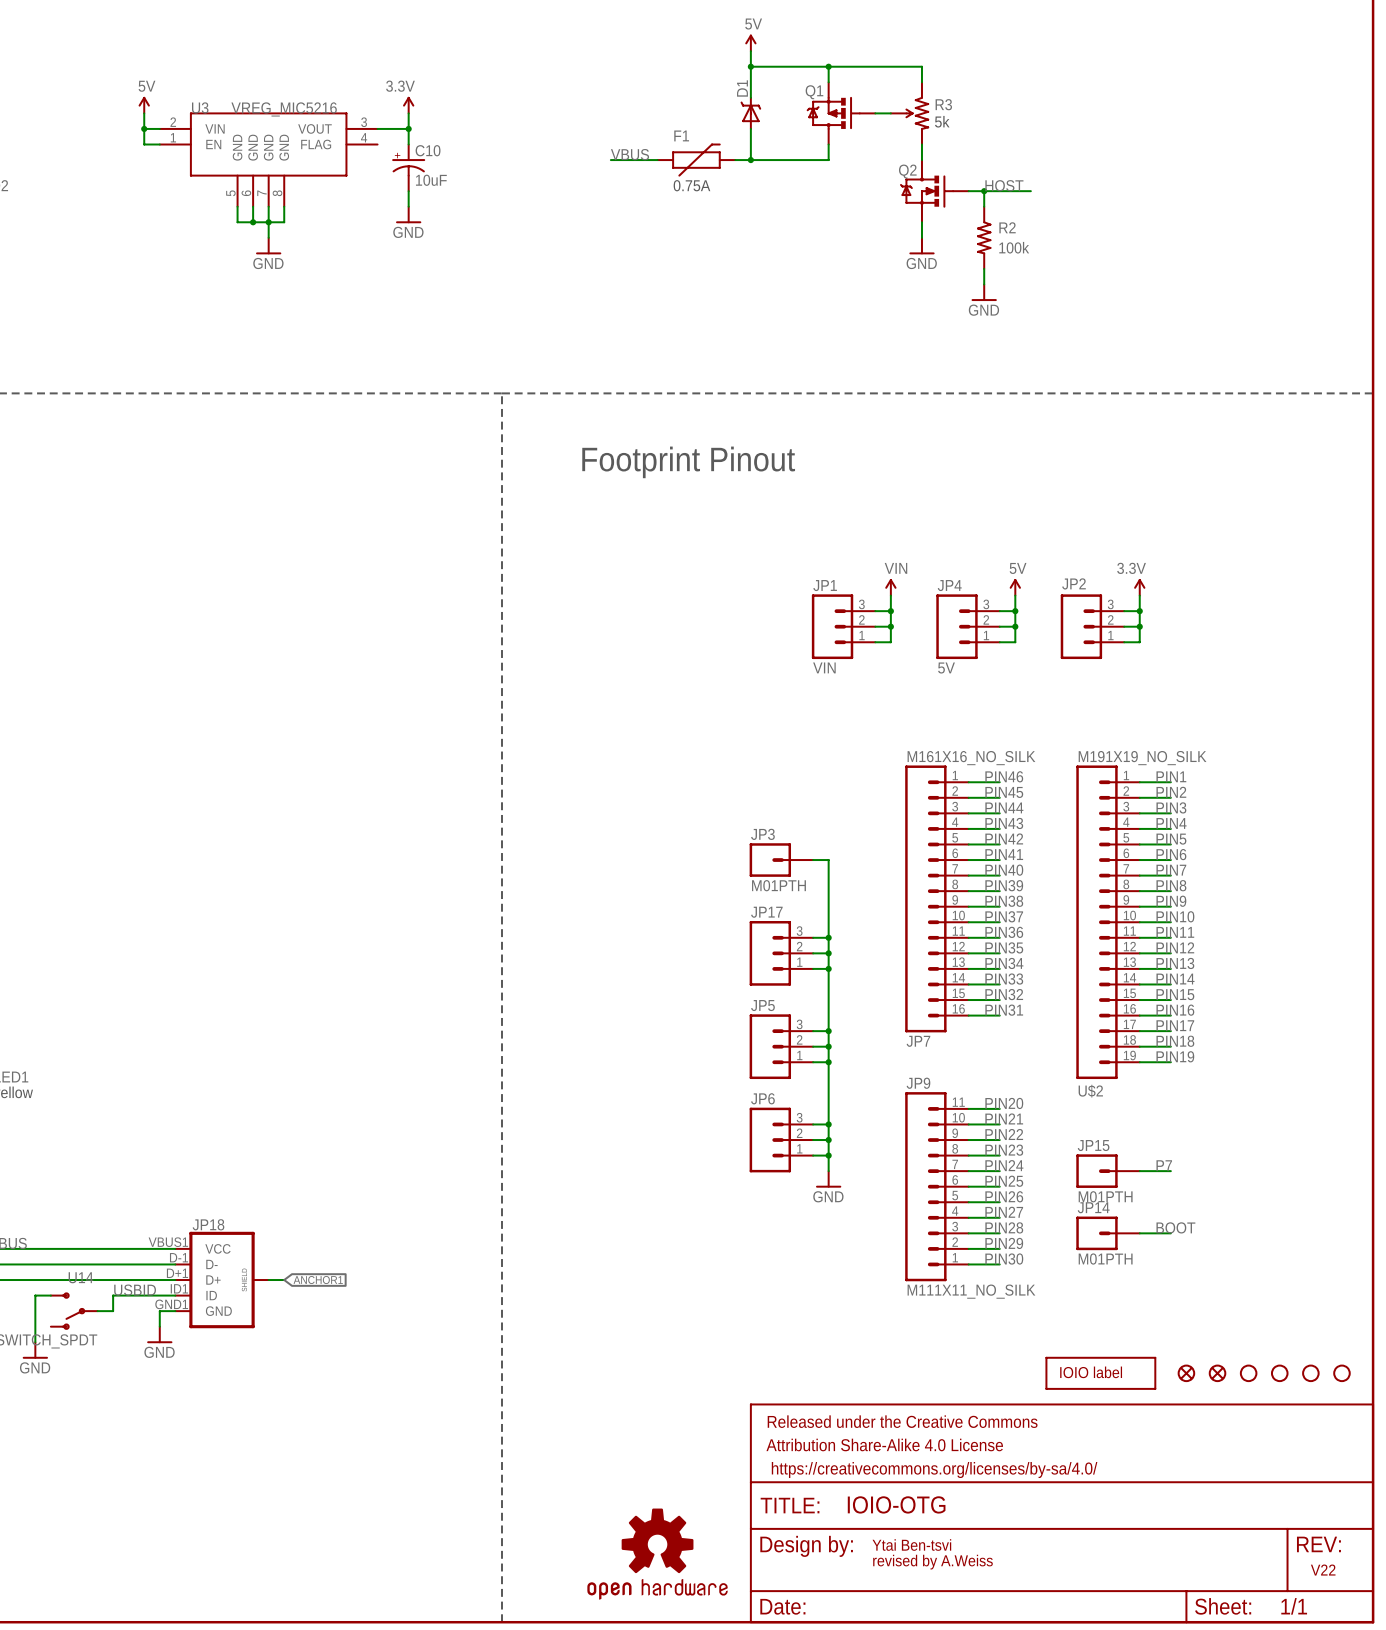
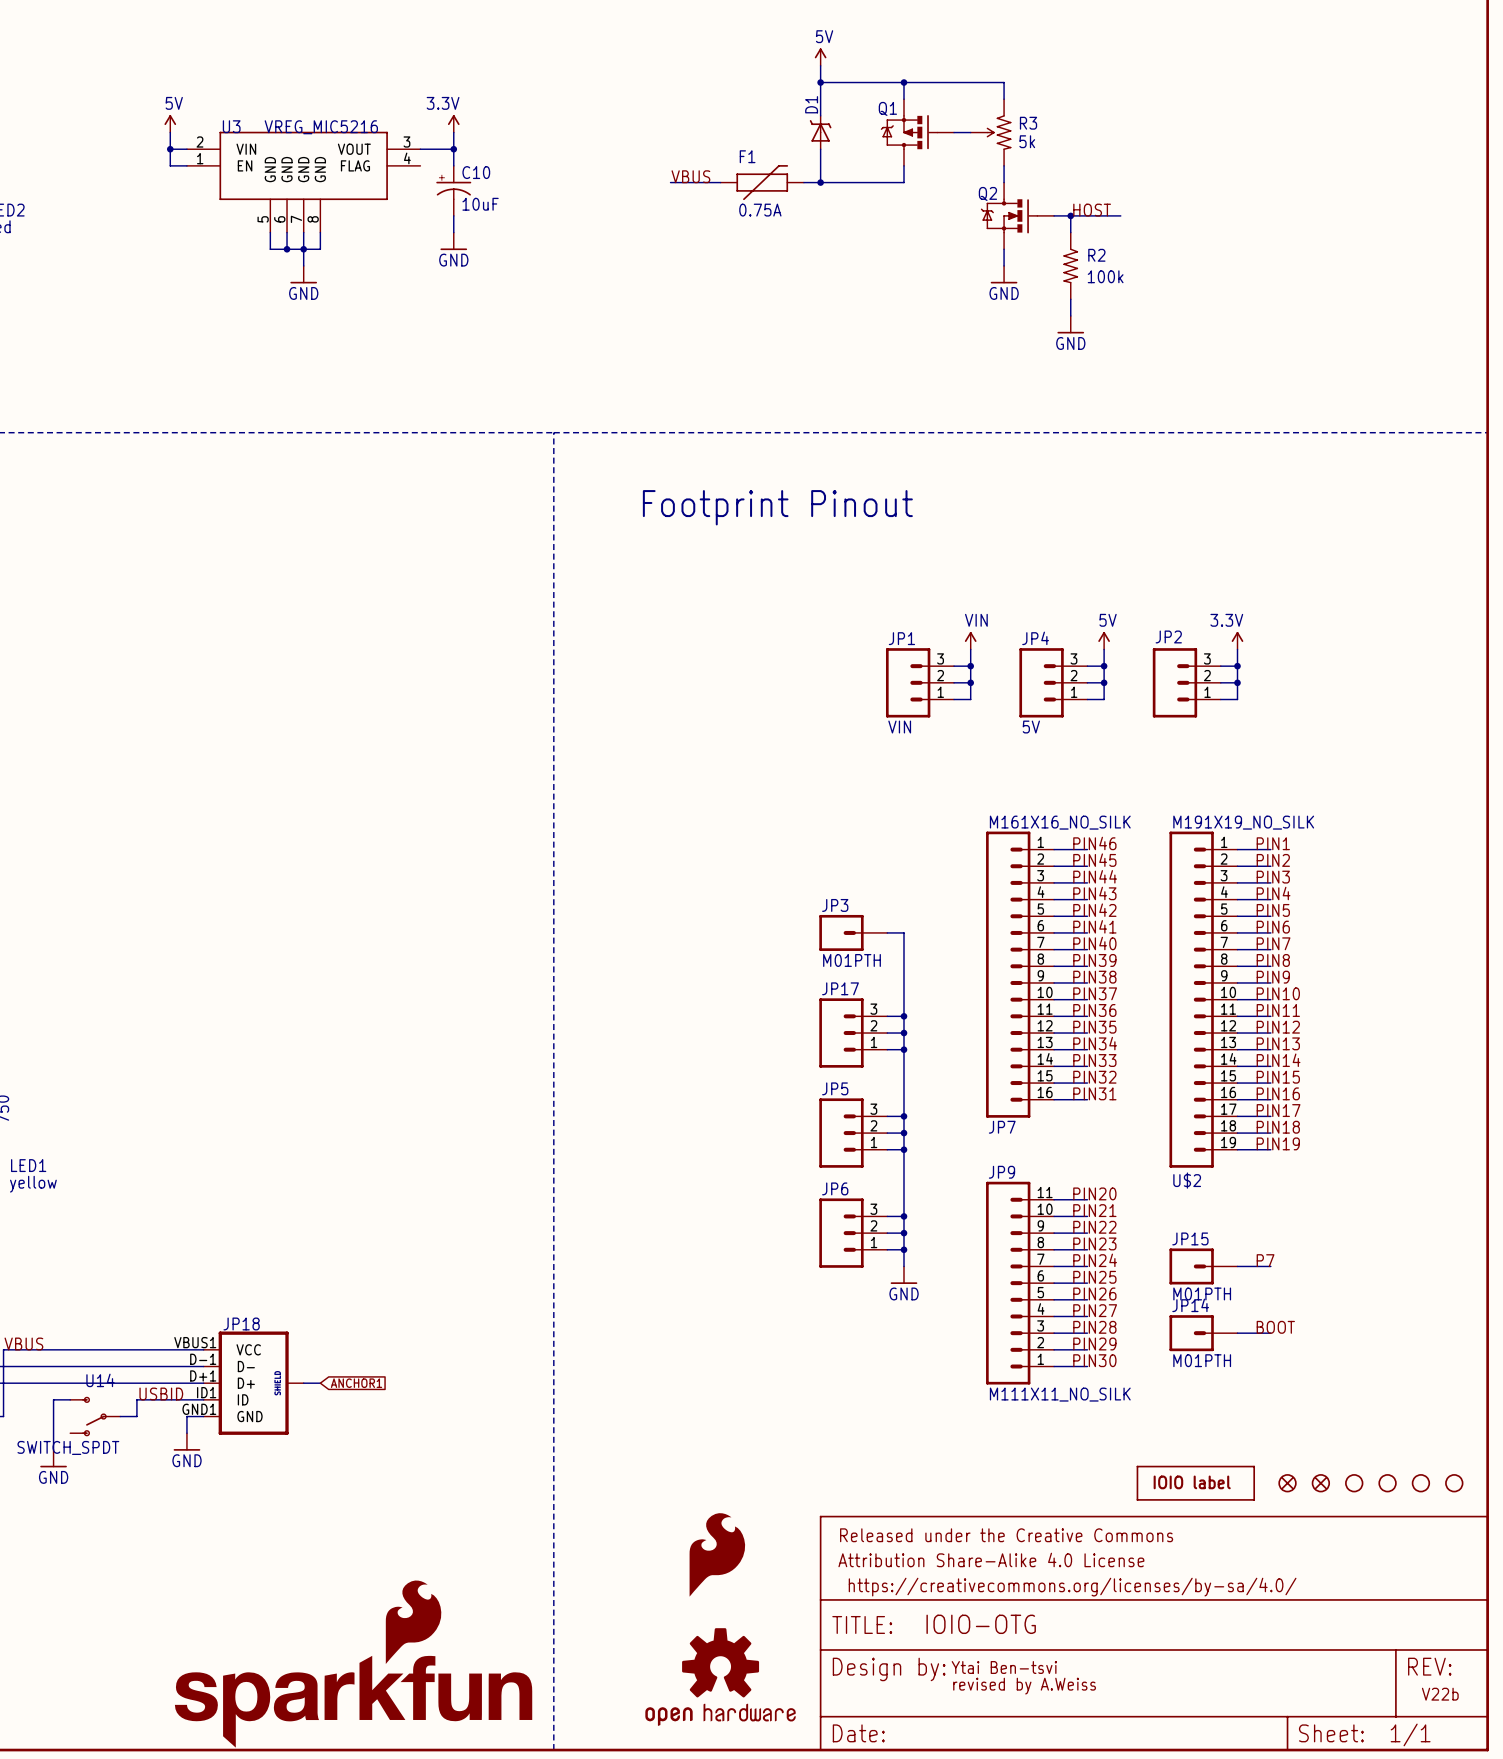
part: none -> (717, 1554)
part: none -> (353, 1664)
text: V22 (1323, 1570) -> V22b (1440, 1694)

